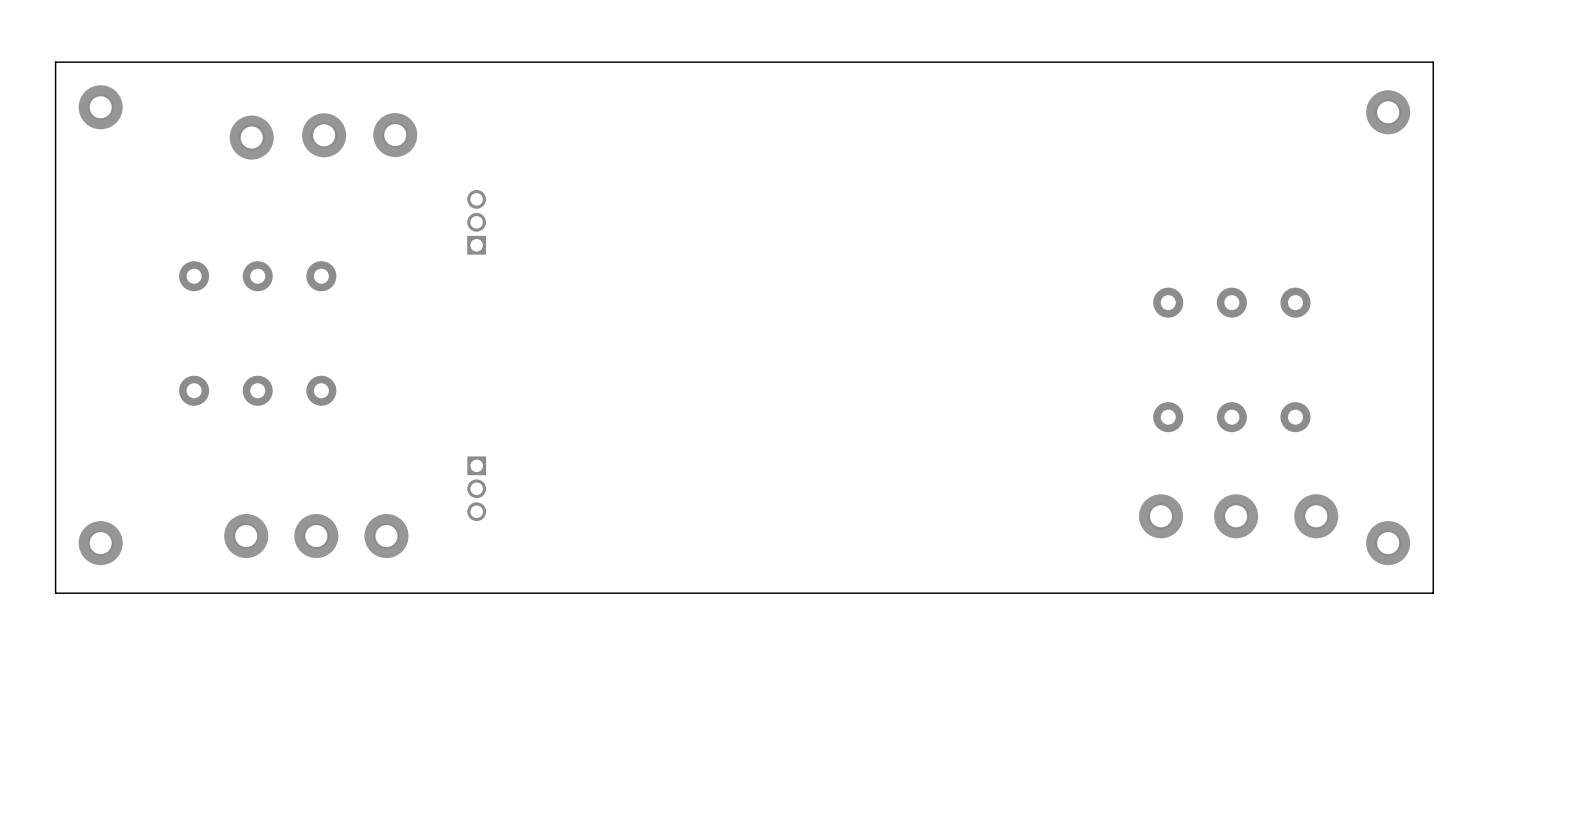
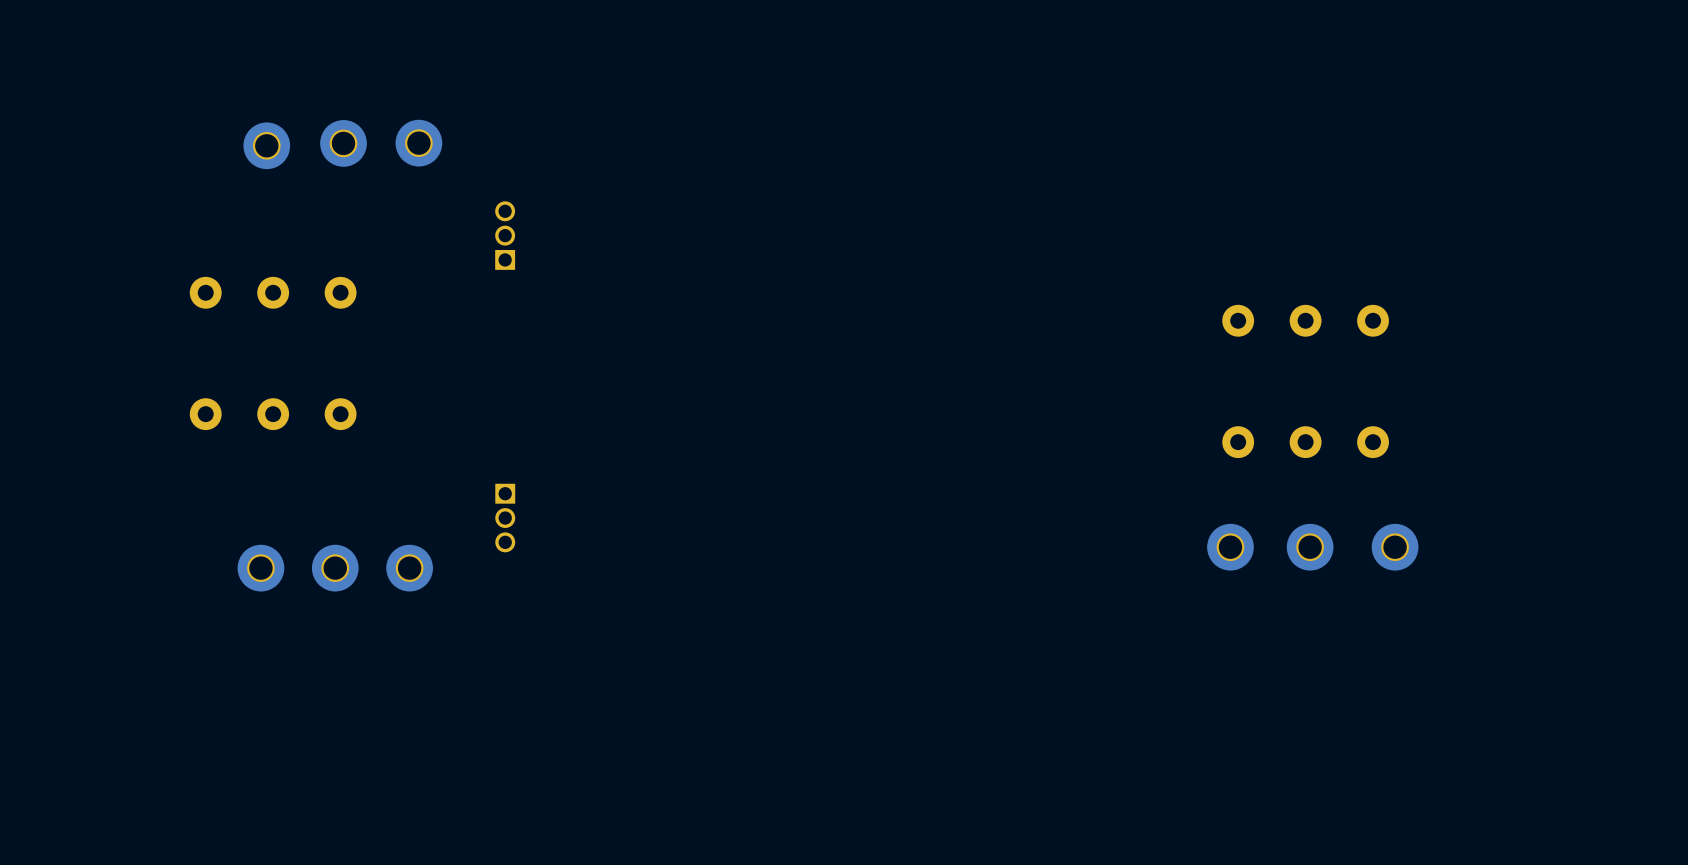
board edge: (1433, 62) (55, 62) (55, 593) (1433, 593) (1433, 62) -> none
part: (100, 107) -> none
part: (1388, 112) -> none
part: (100, 543) -> none
part: (1388, 543) -> none

